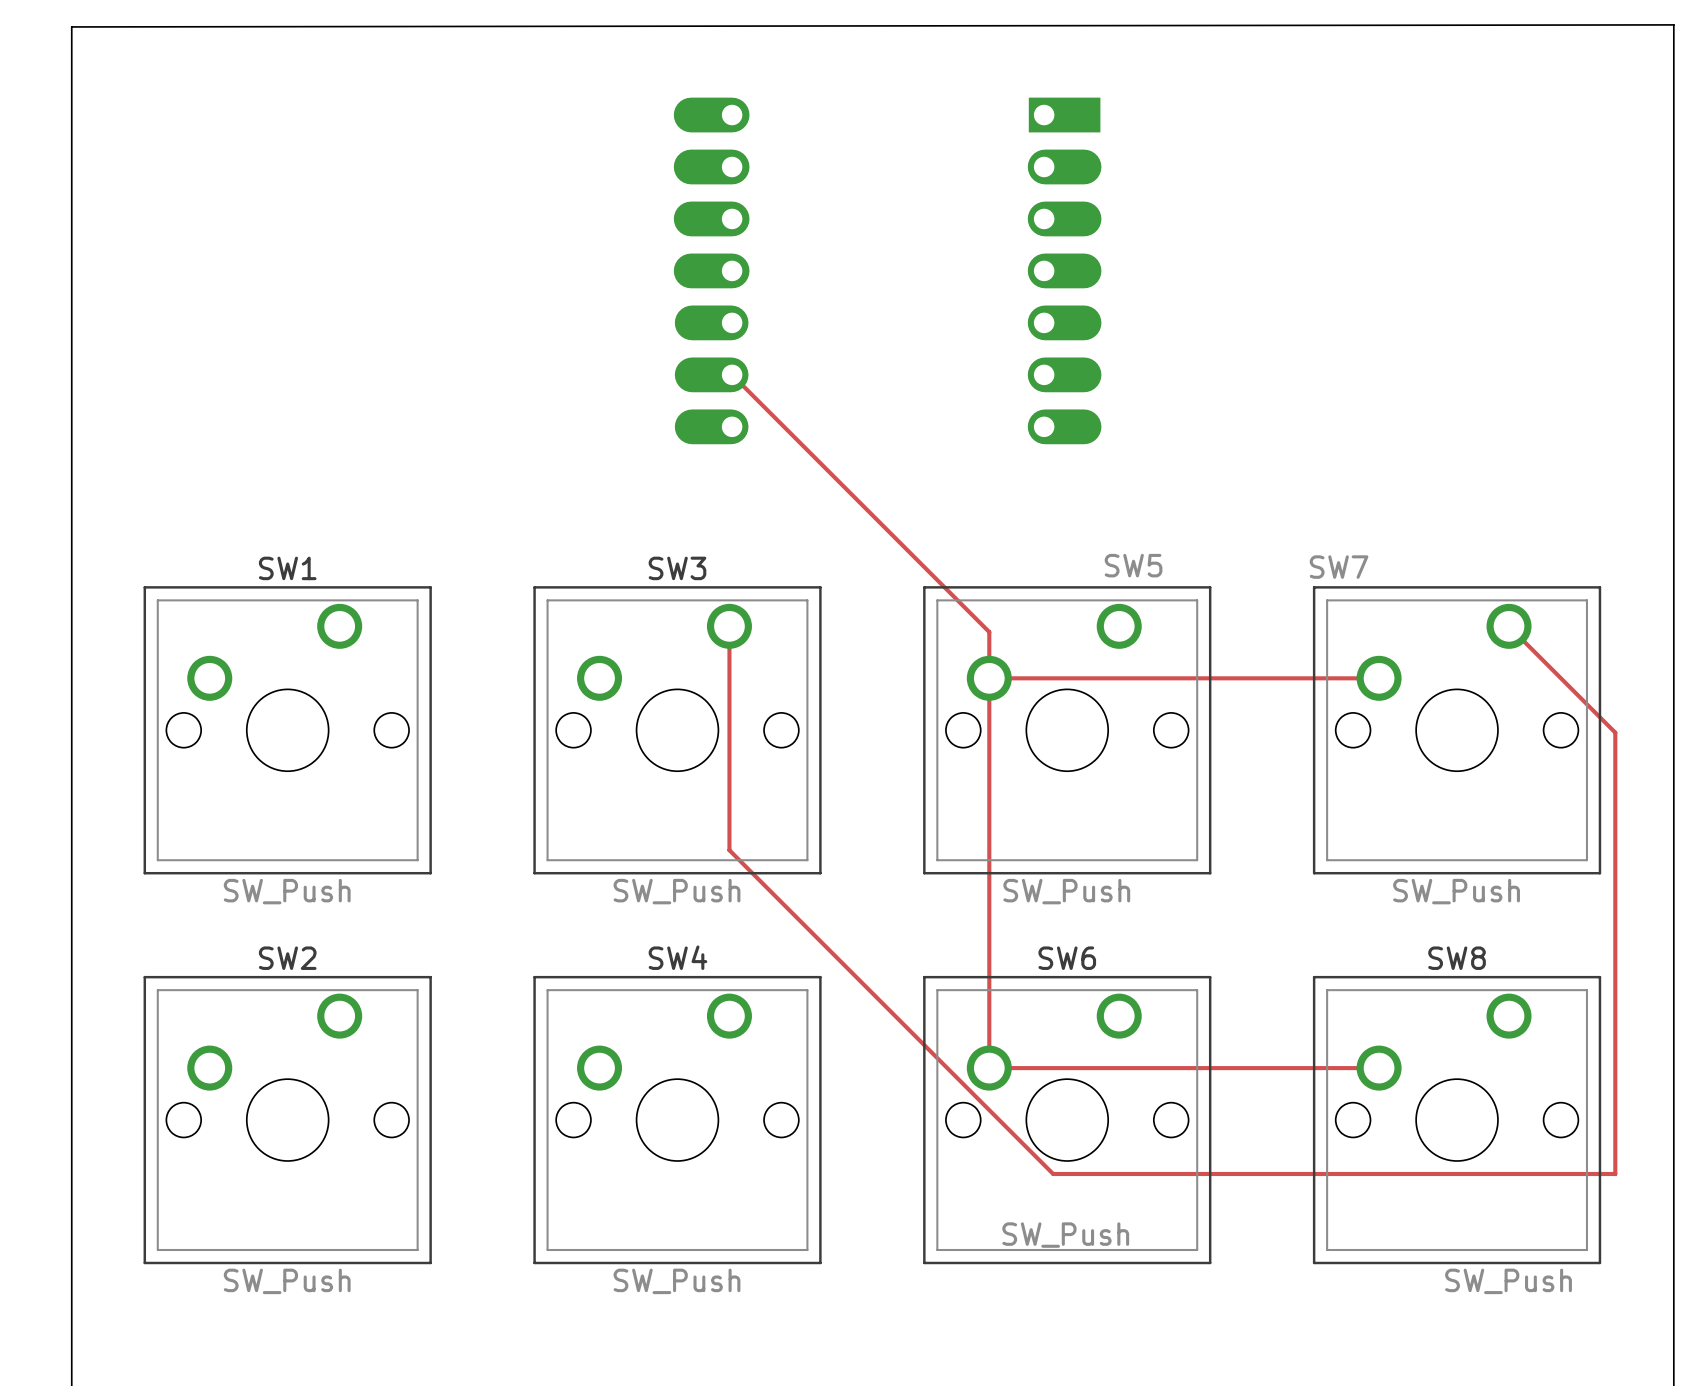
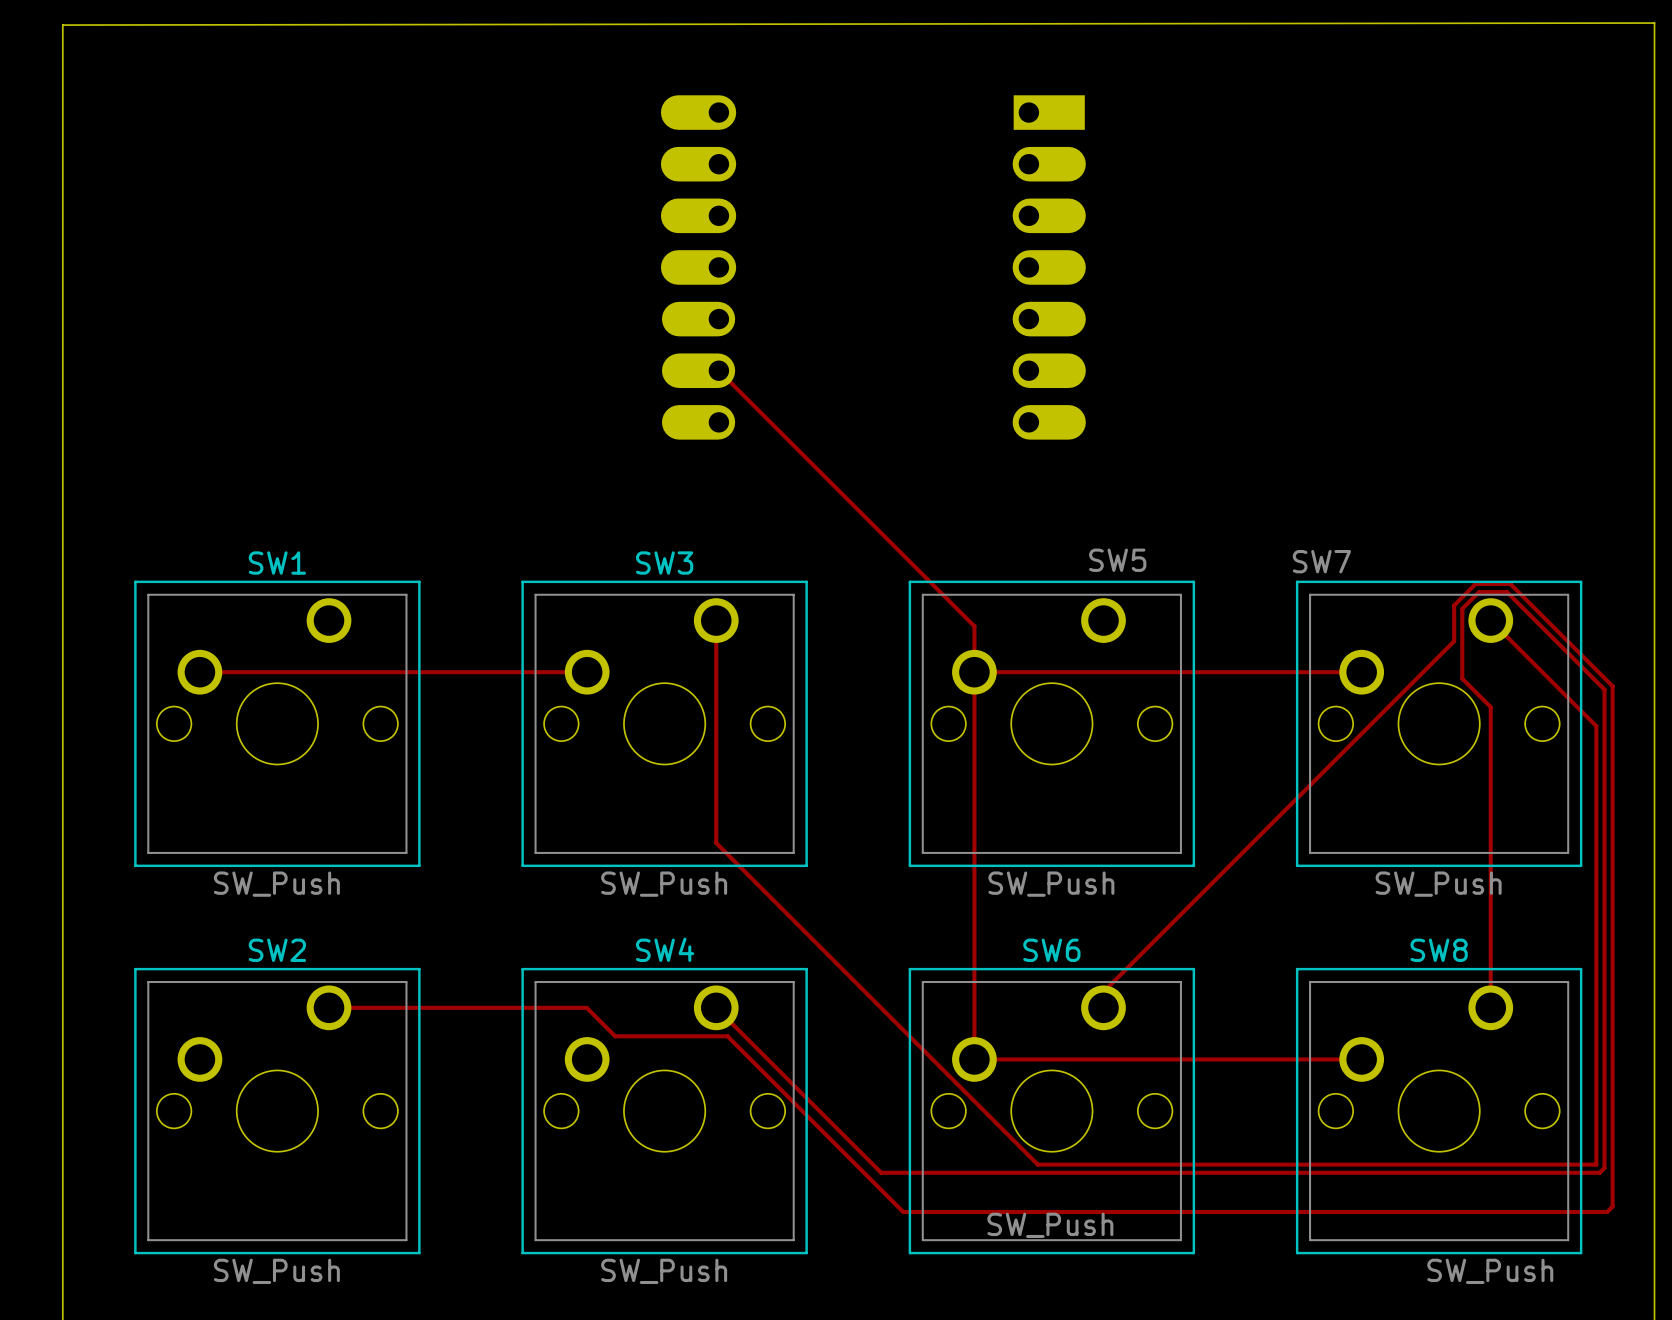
top track: none -> (199, 672) (587, 672)
top track: none -> (329, 1007) (586, 1007) (615, 1036) (727, 1036) (903, 1212) (1607, 1212) (1612, 1206) (1612, 686) (1510, 583) (1475, 583) (1454, 605) (1454, 641) (1103, 991) (1103, 1007)
top track: none -> (716, 1007) (881, 1172) (1599, 1172) (1604, 1168) (1604, 689) (1507, 592) (1478, 592) (1462, 608) (1462, 678) (1490, 707) (1490, 1007)

